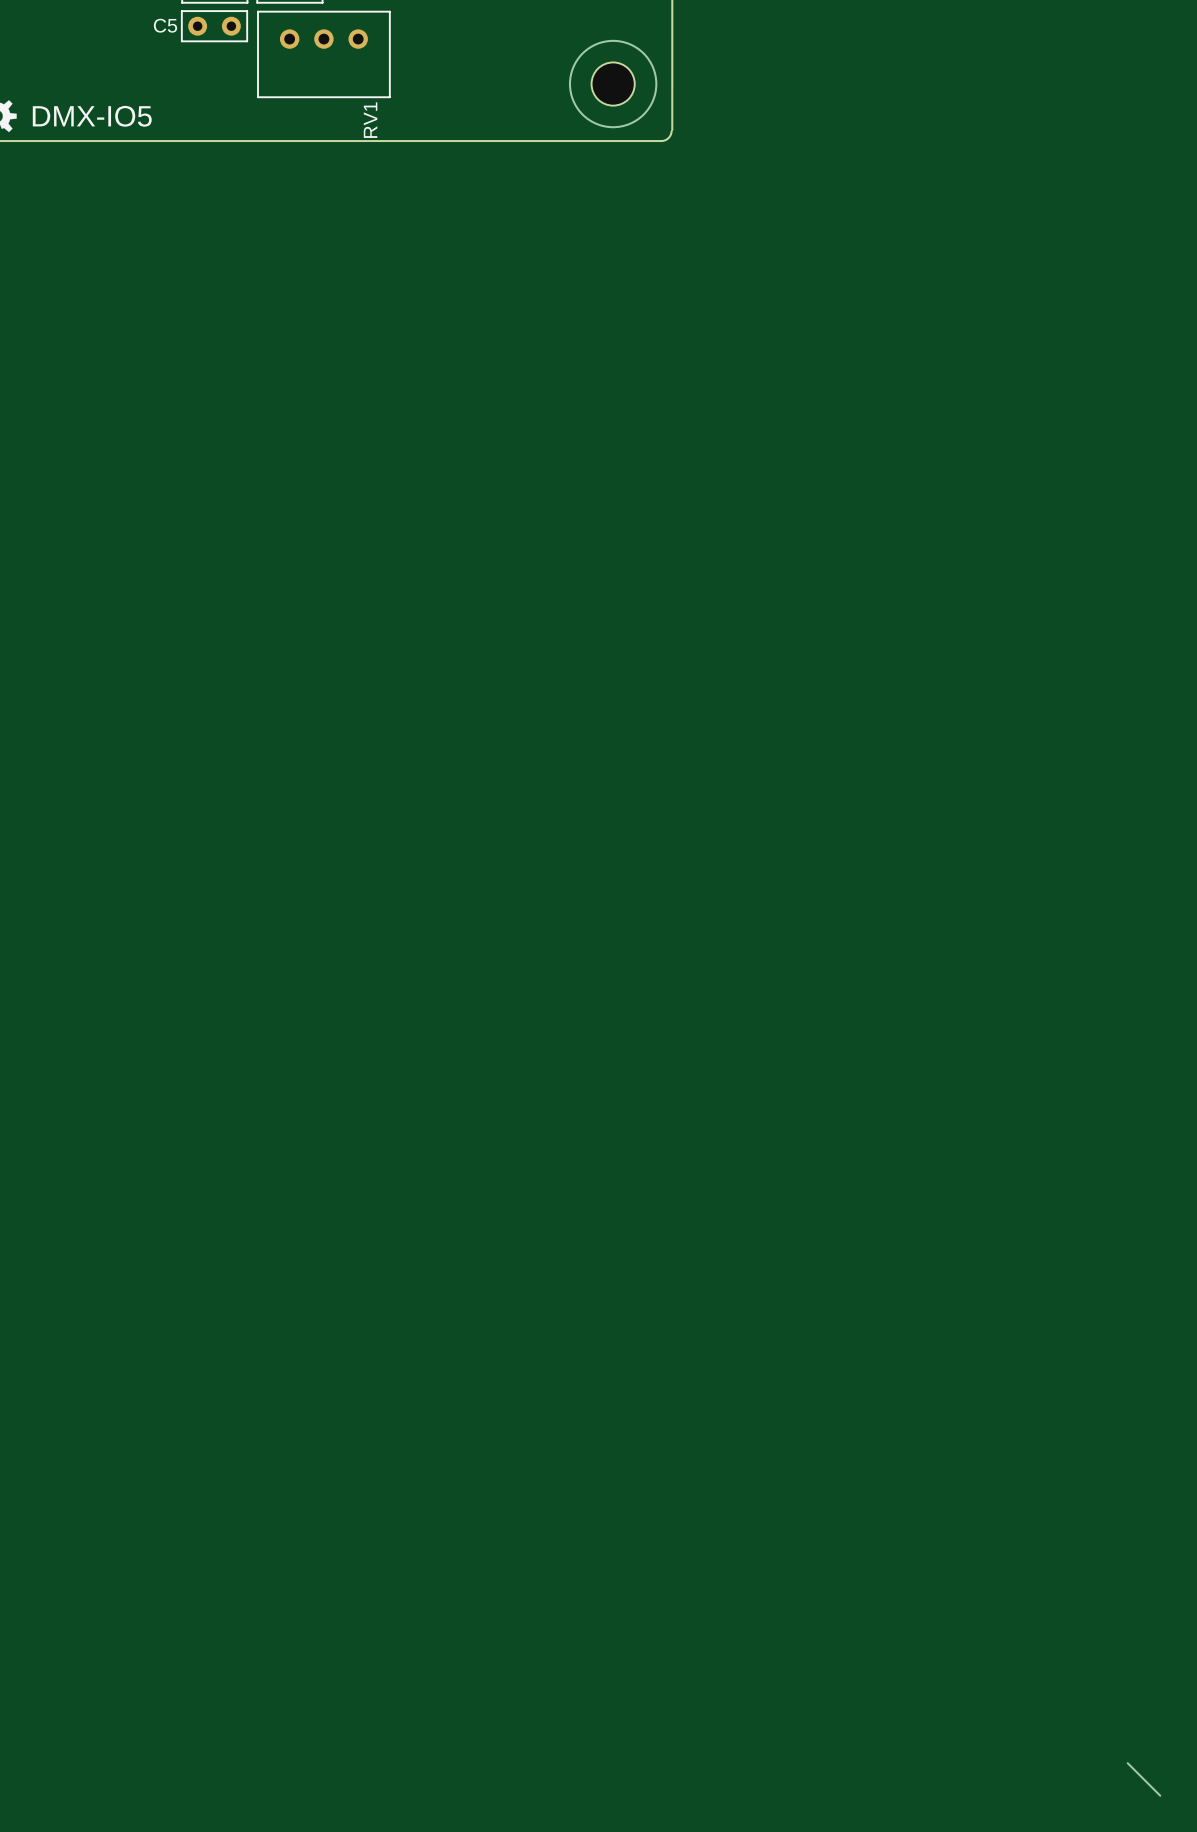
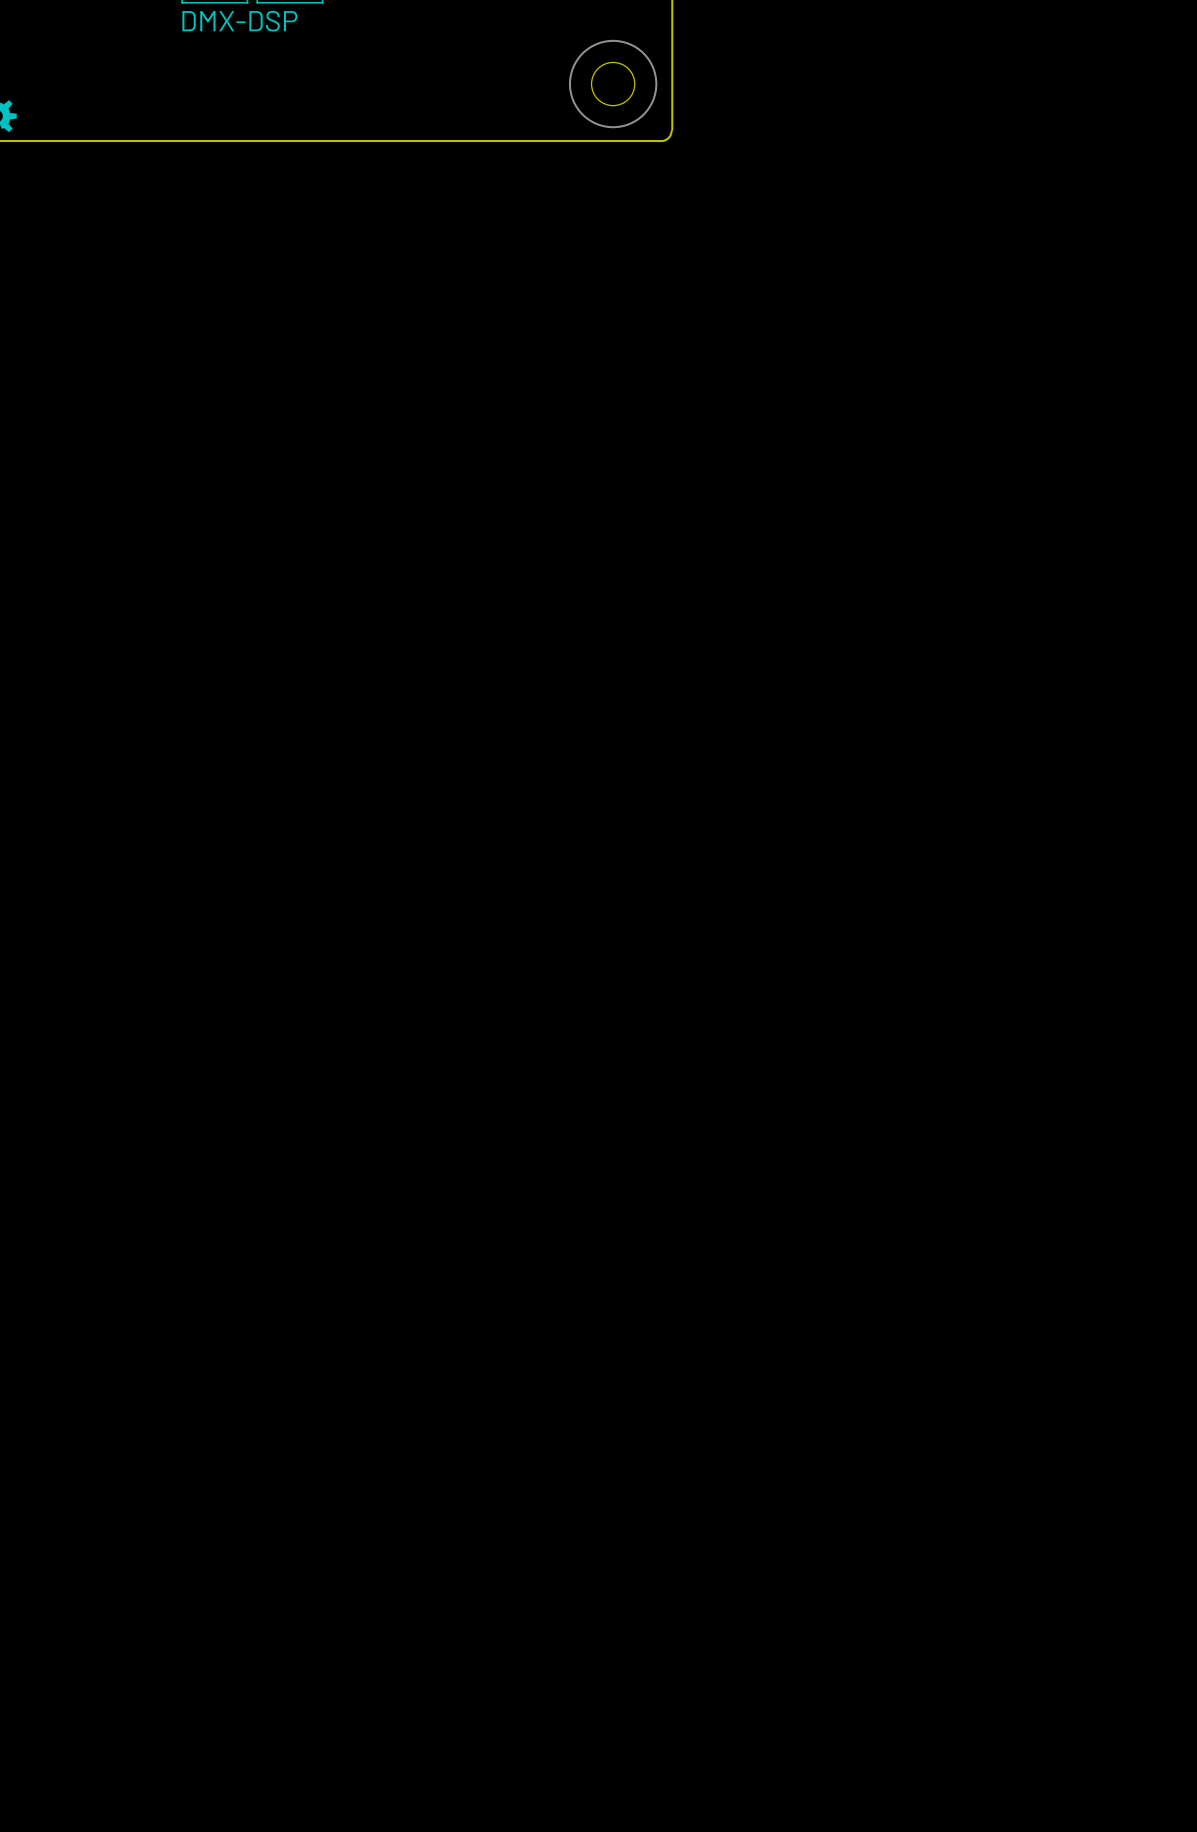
text: none -> DMX-DSP (239, 21)
C5: (214, 26) -> none
RV1: (323, 54) -> none
text: DMX-IO5 (92, 116) -> none
line: (1127, 1763) (1160, 1795) -> none

